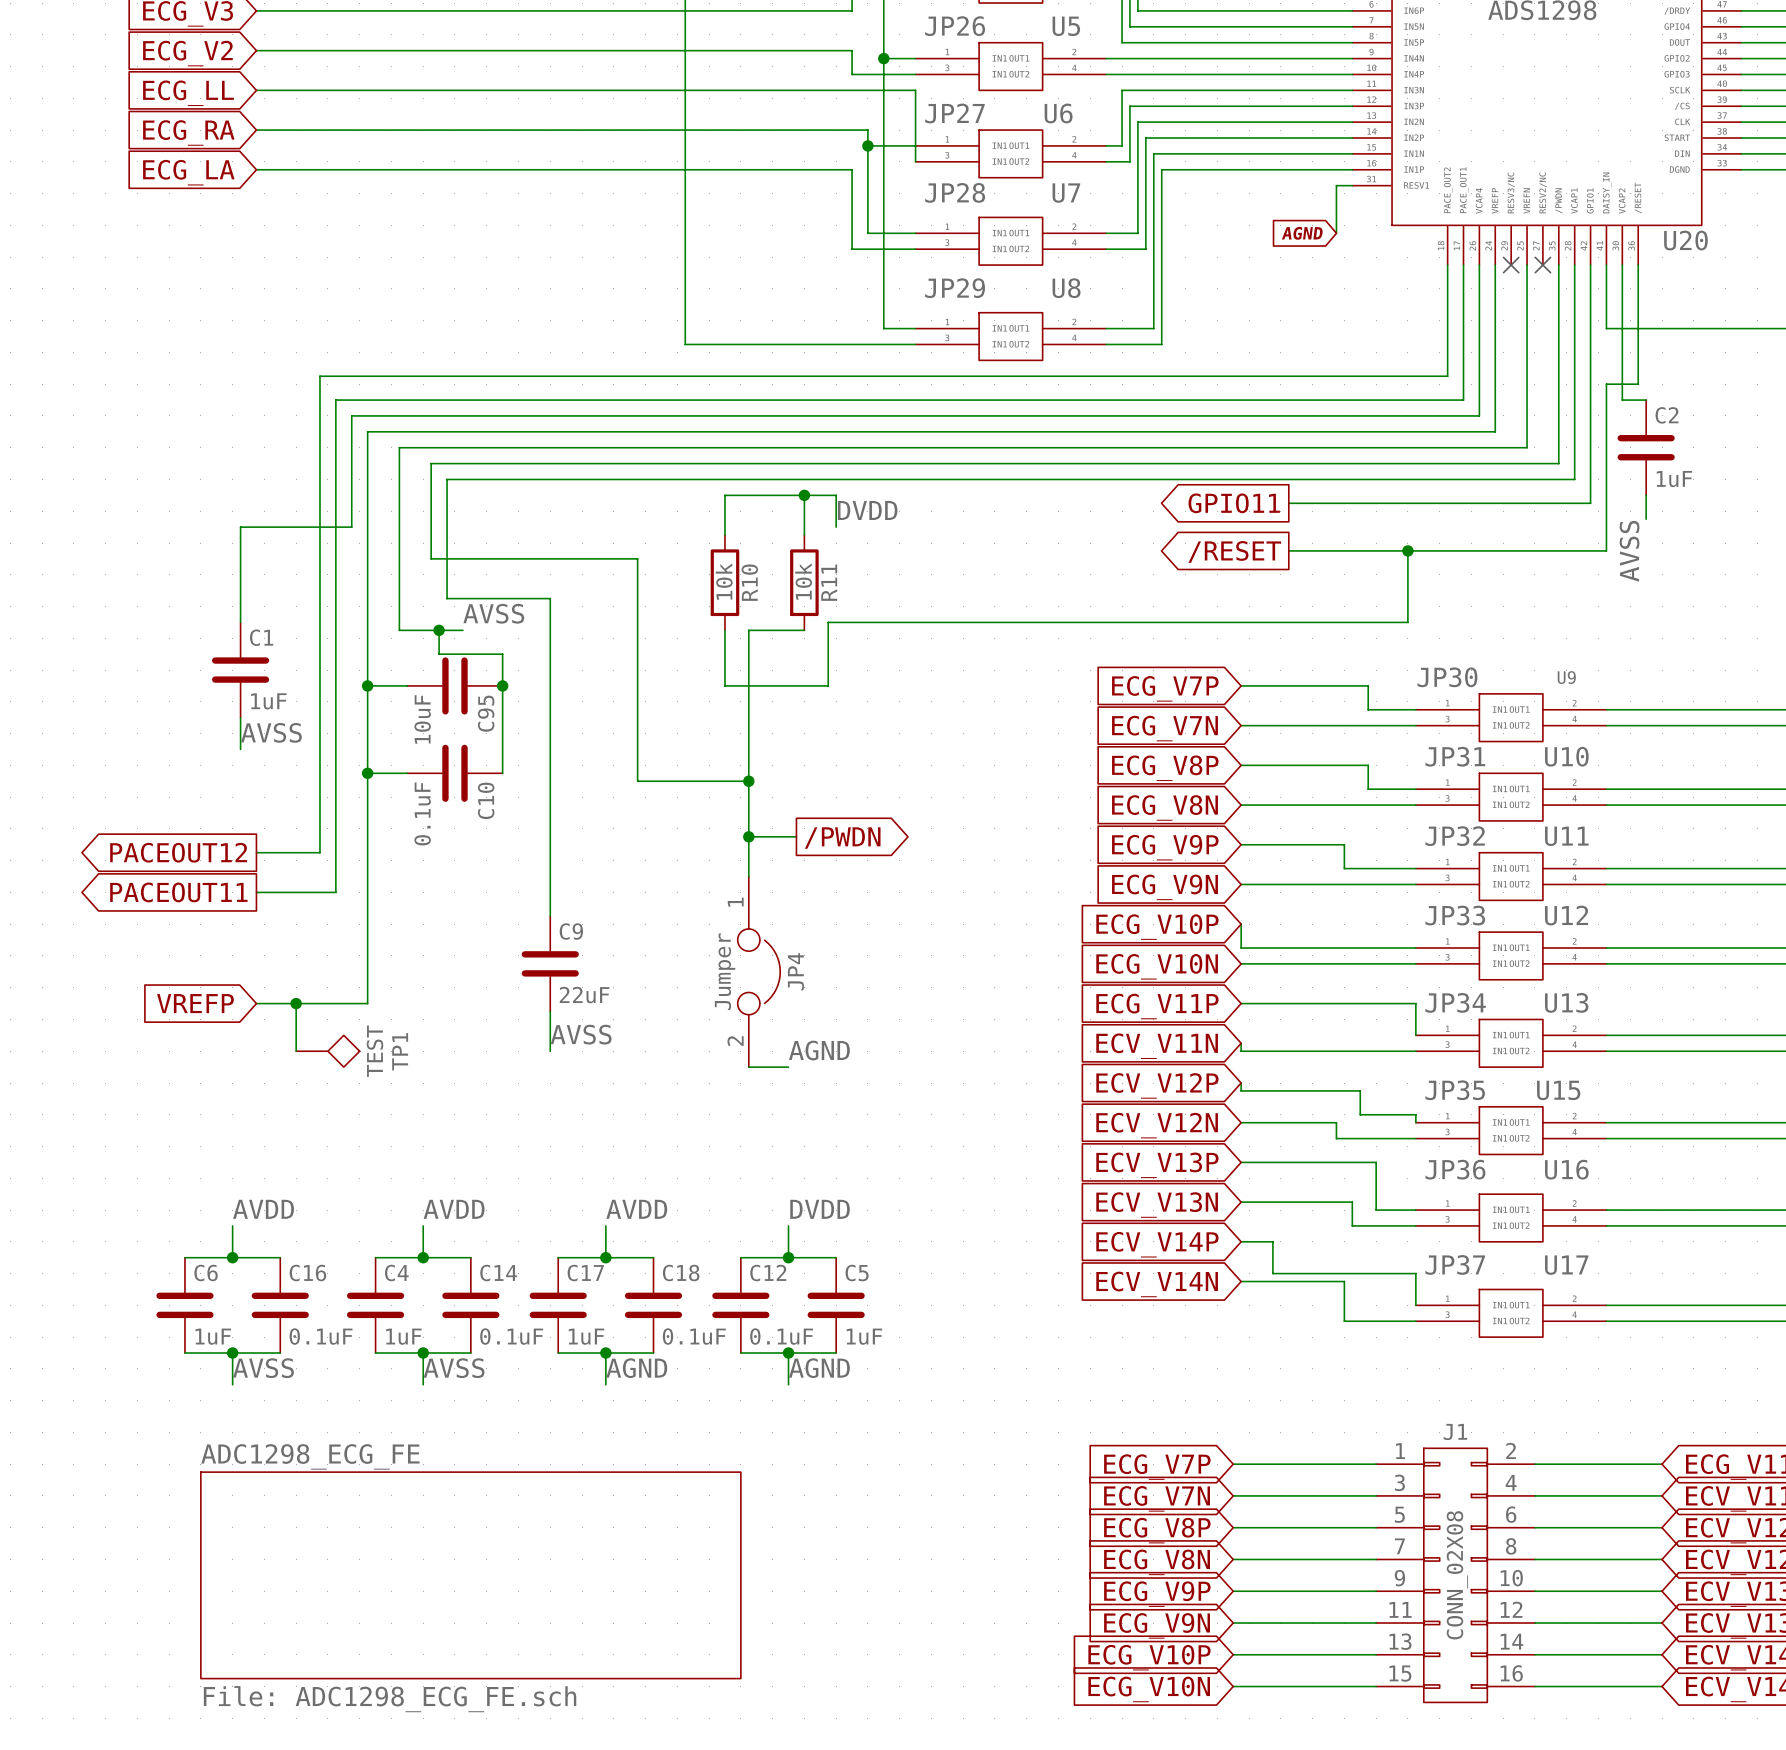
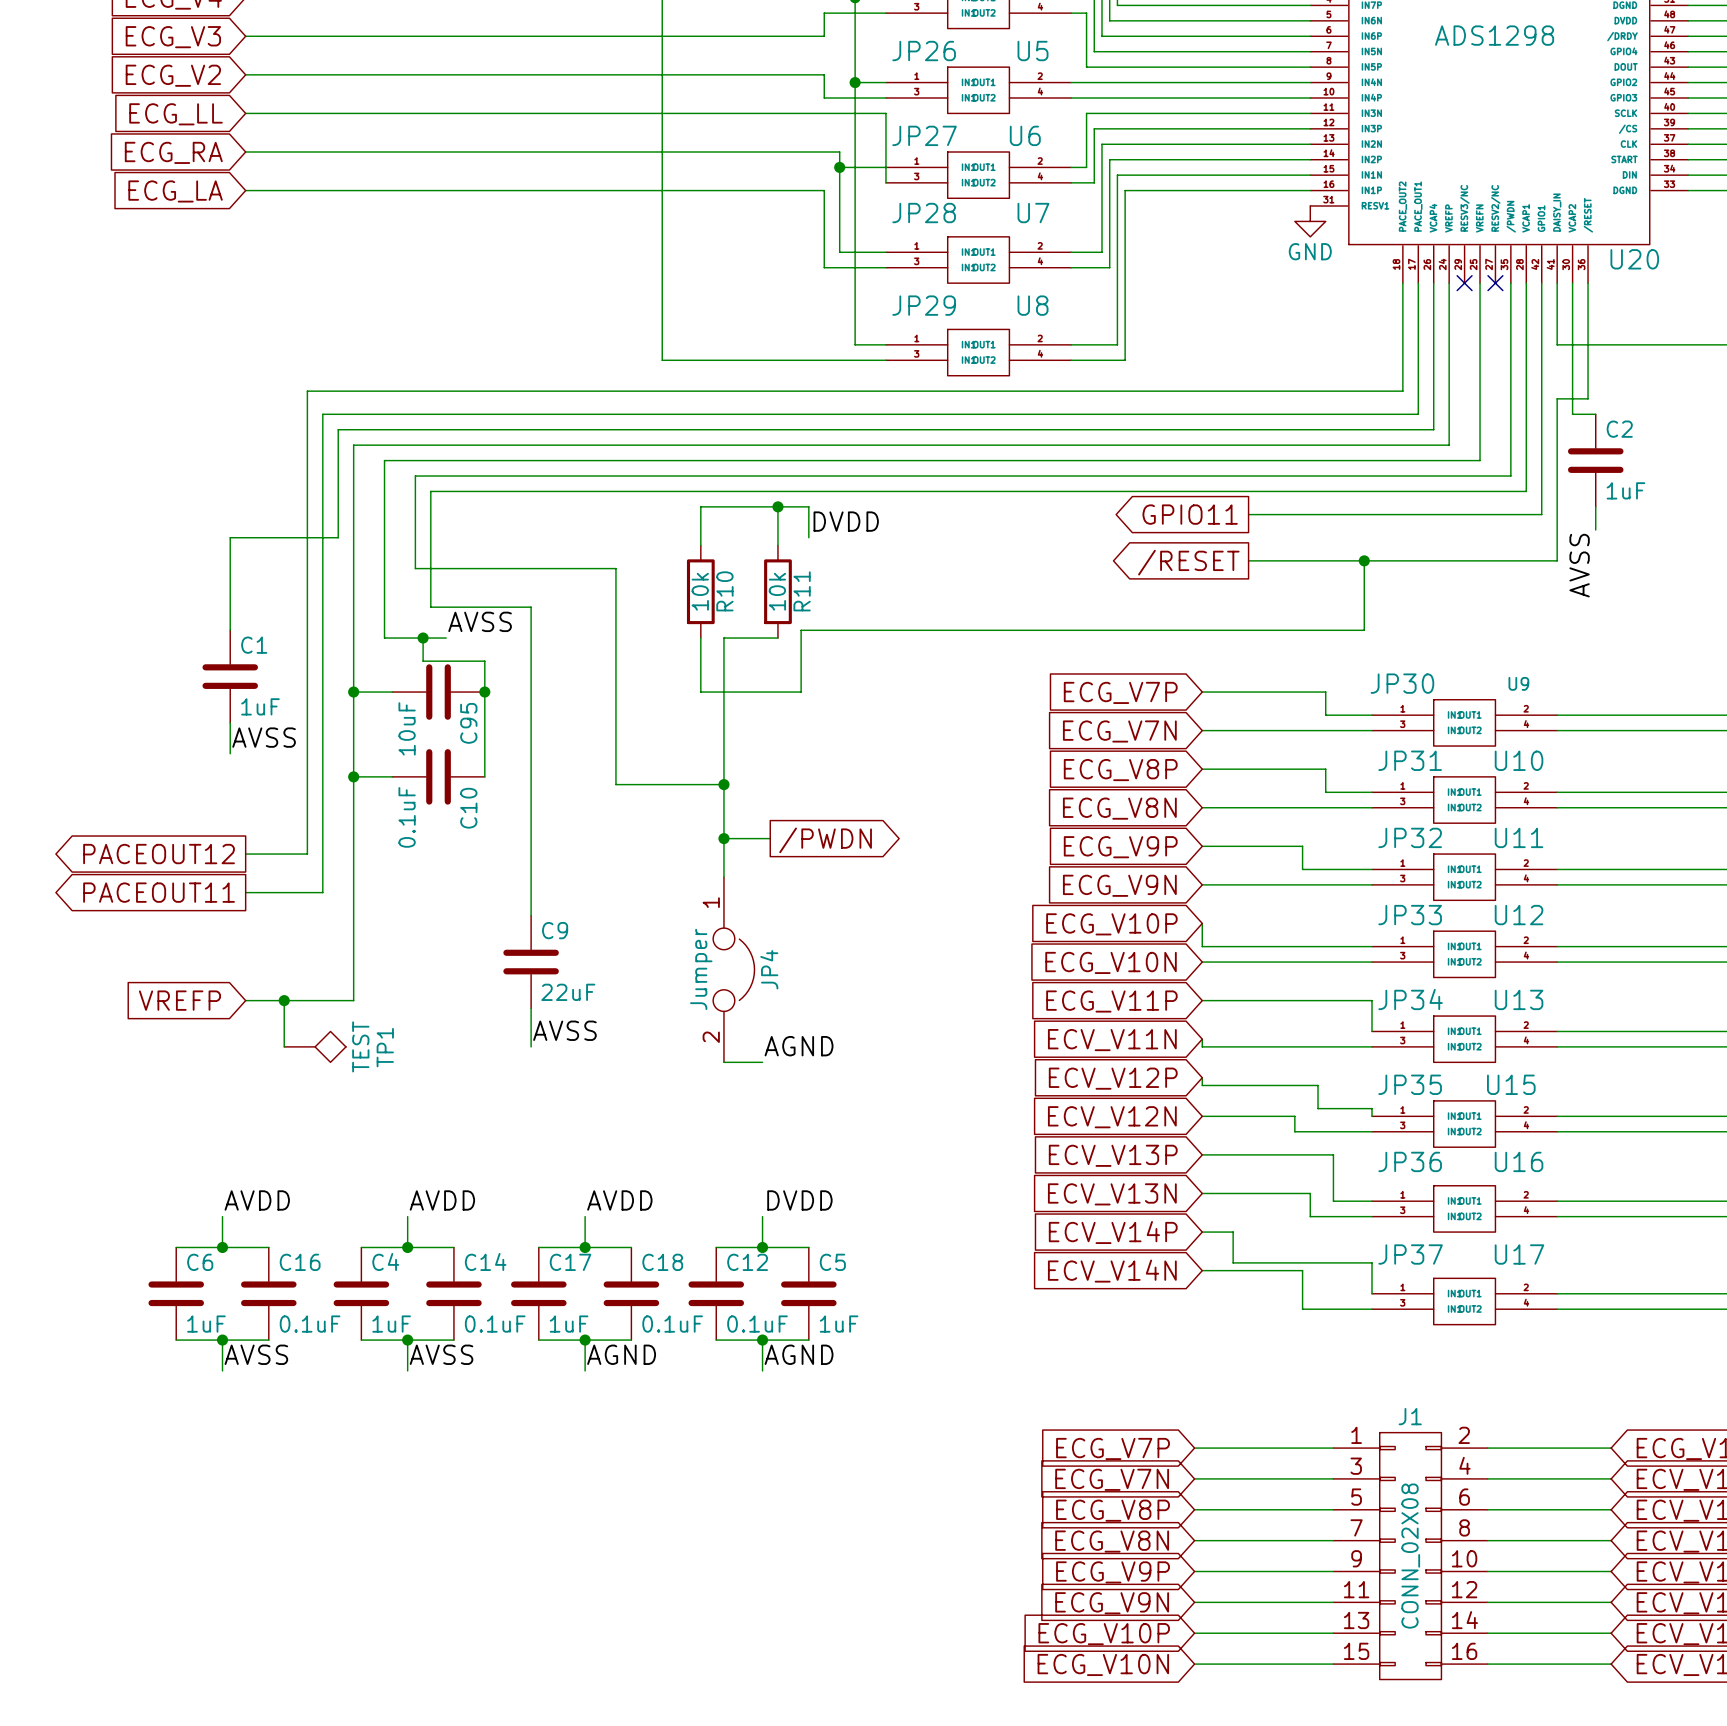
wire: (1352, 185) (1336, 185) (1336, 233) -> none
power symbol: none -> GND (1310, 221)
global label: AGND (1302, 233) -> none
sheet ADC1298_ECG_FE: File: ADC1298_ECG_FE.sch (470, 1575) -> none

